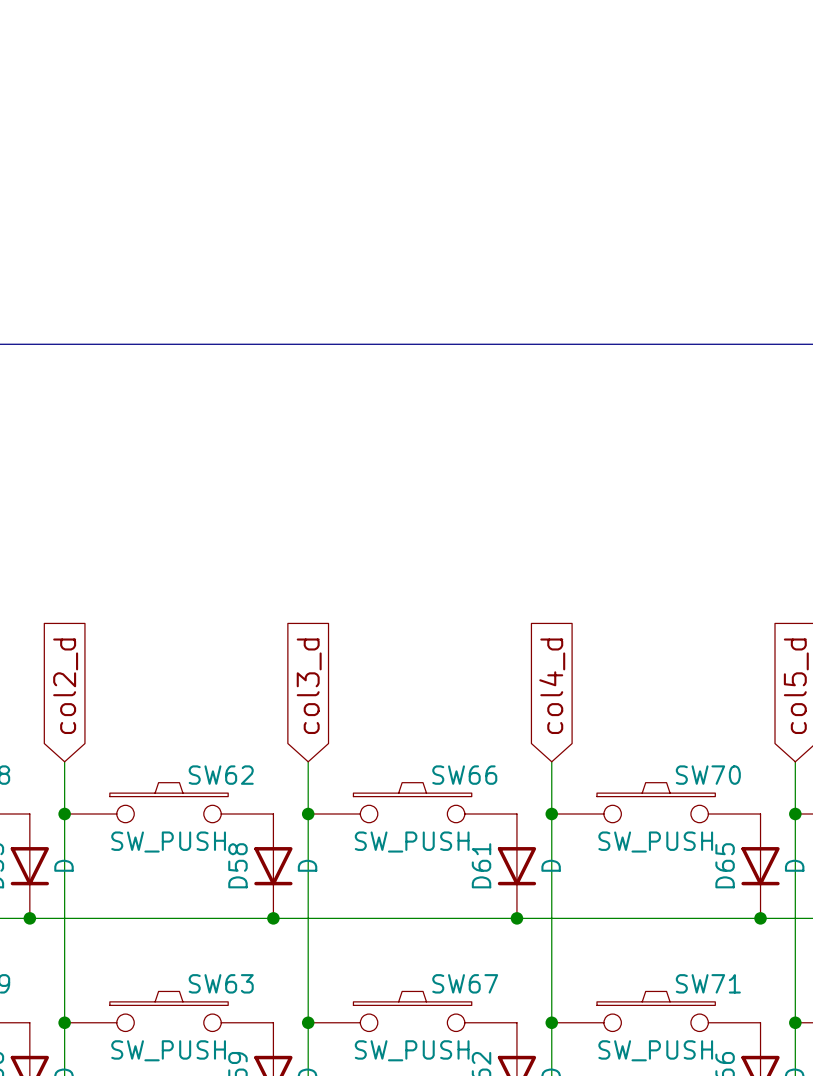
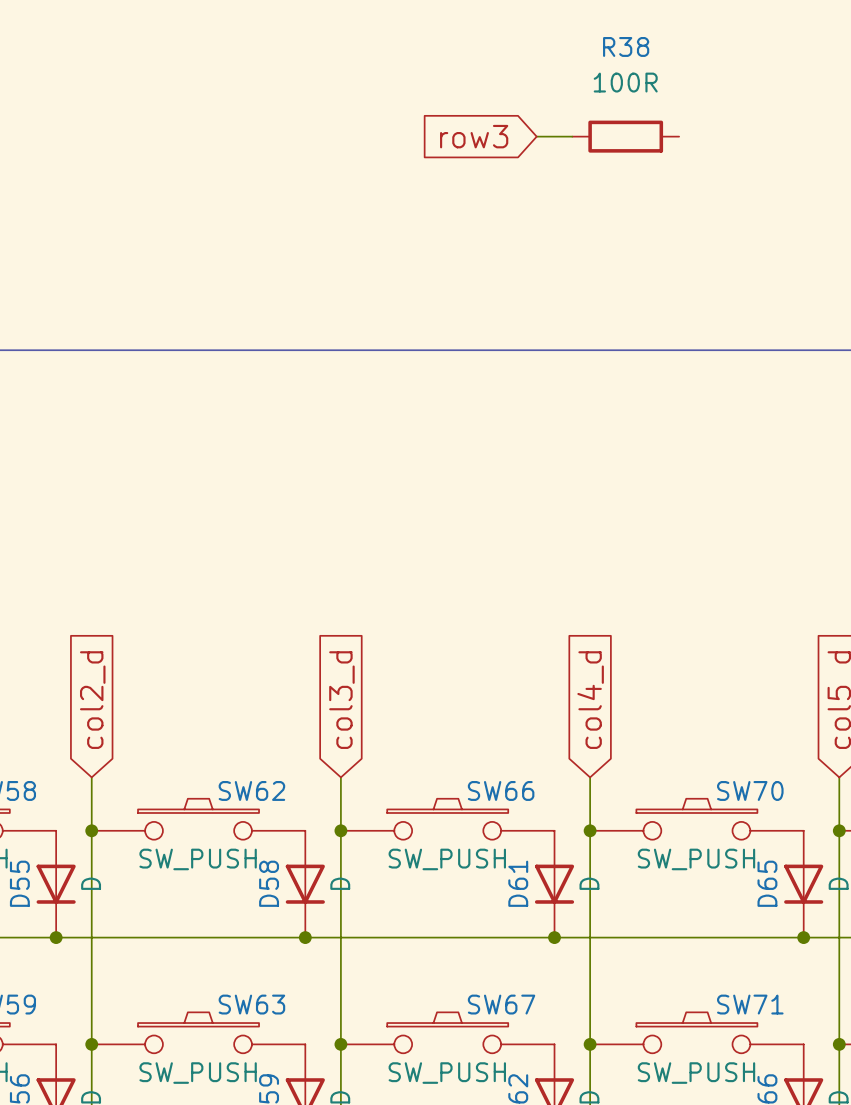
global label: none -> row3 (474, 136)
wire: none -> (536, 136) (572, 136)
R38: none -> 100R (625, 136)

